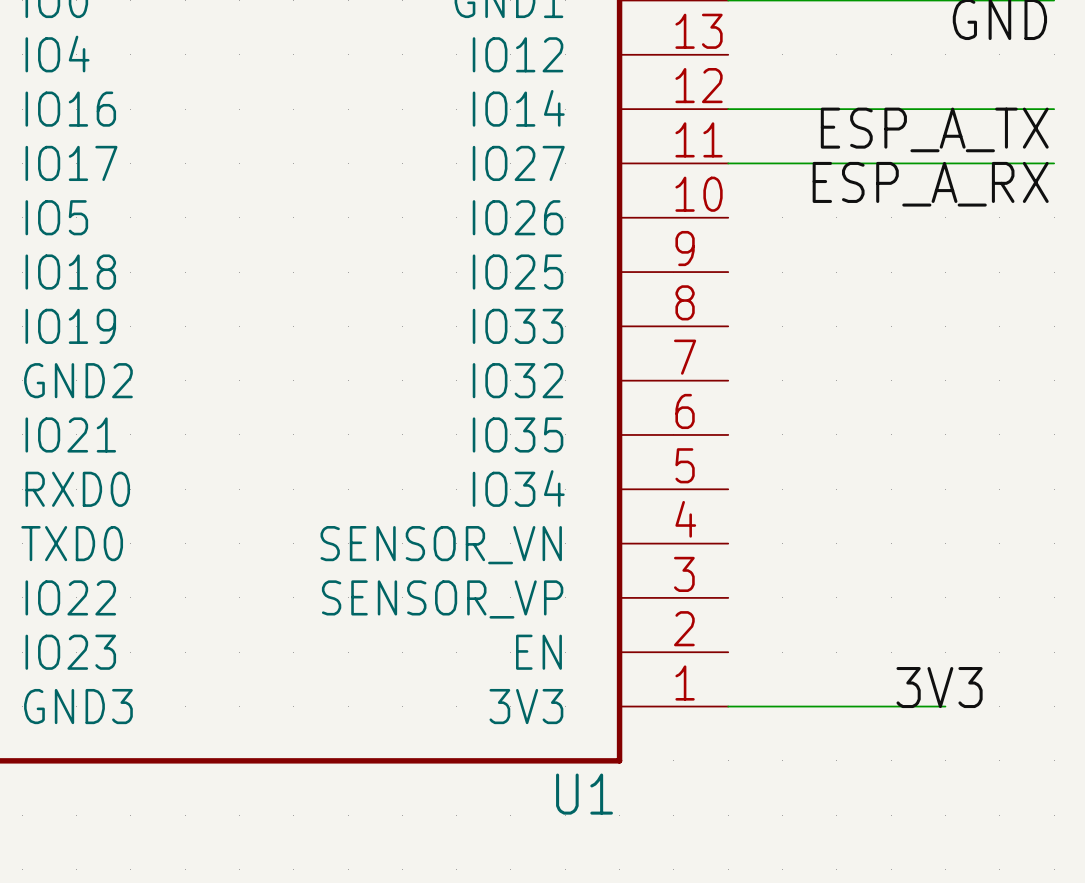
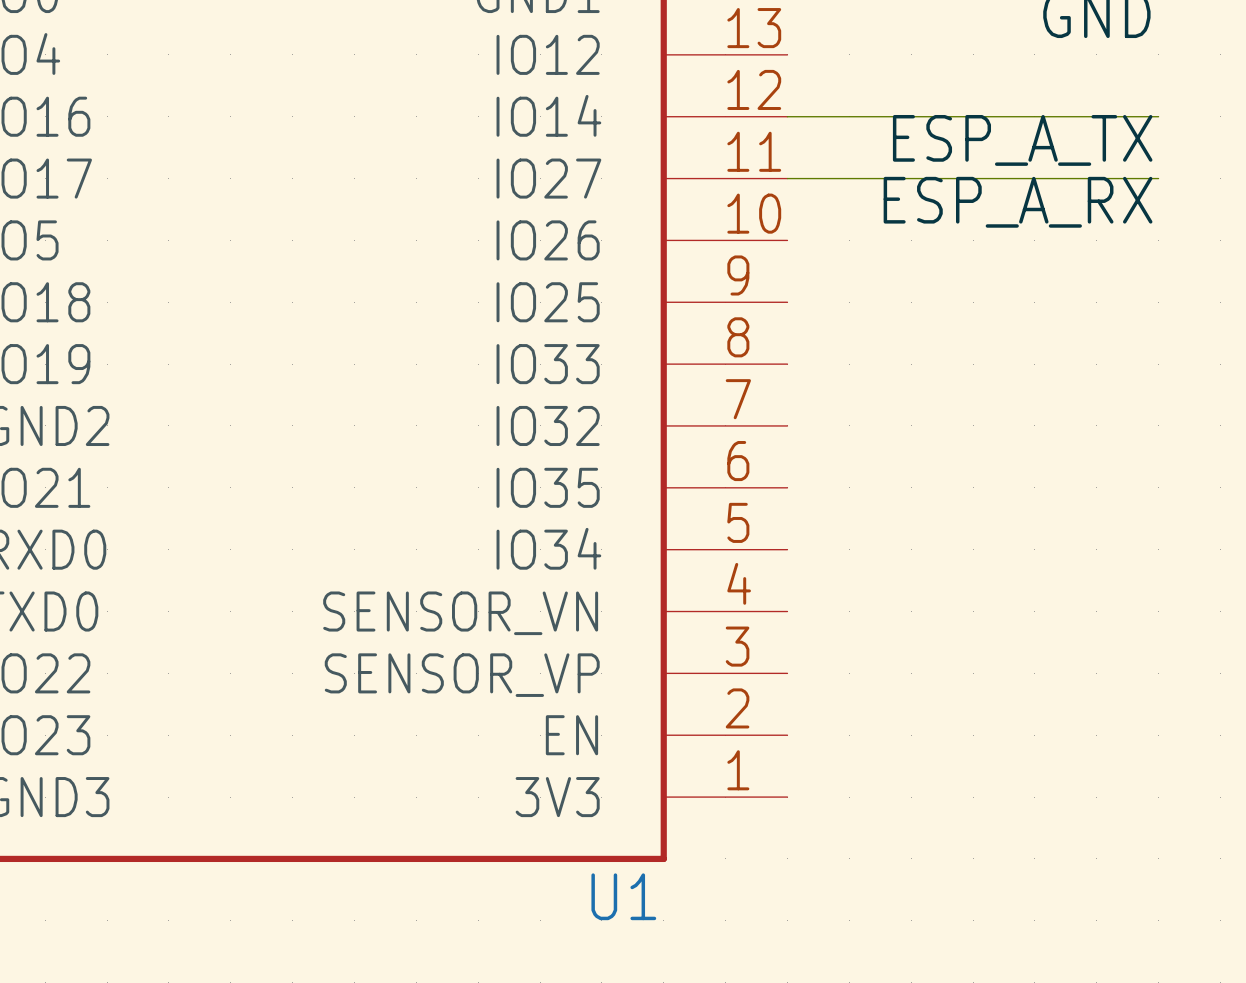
label: 3V3 (939, 687) -> none
wire: (728, 706) (945, 706) -> none

